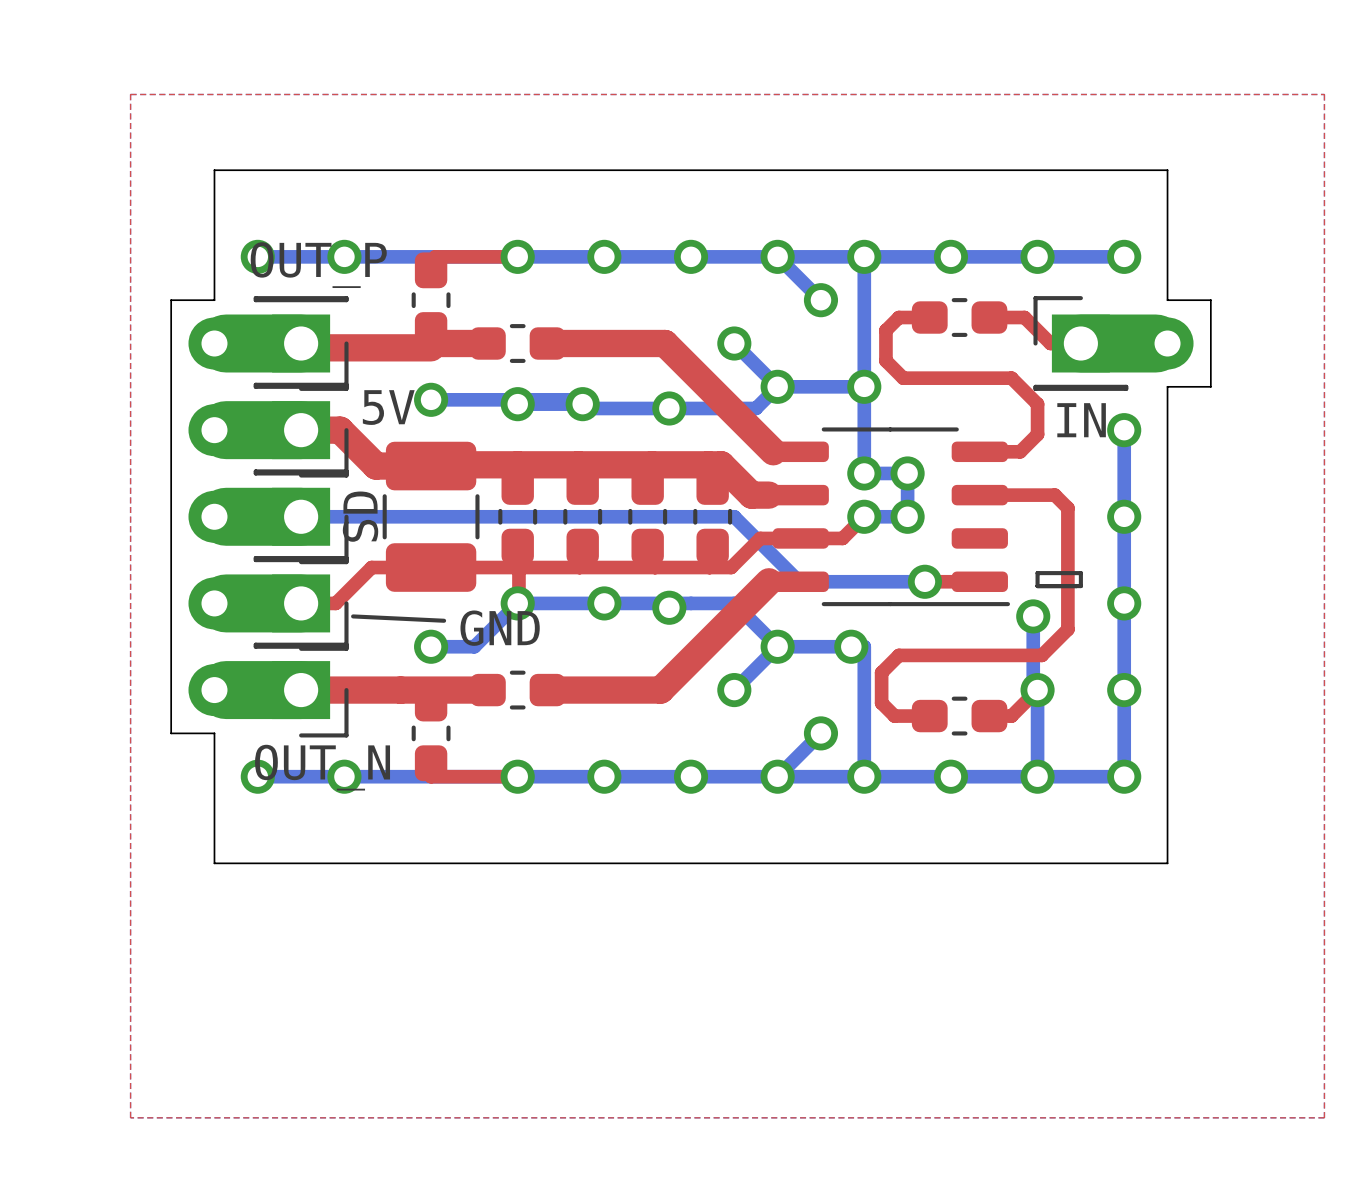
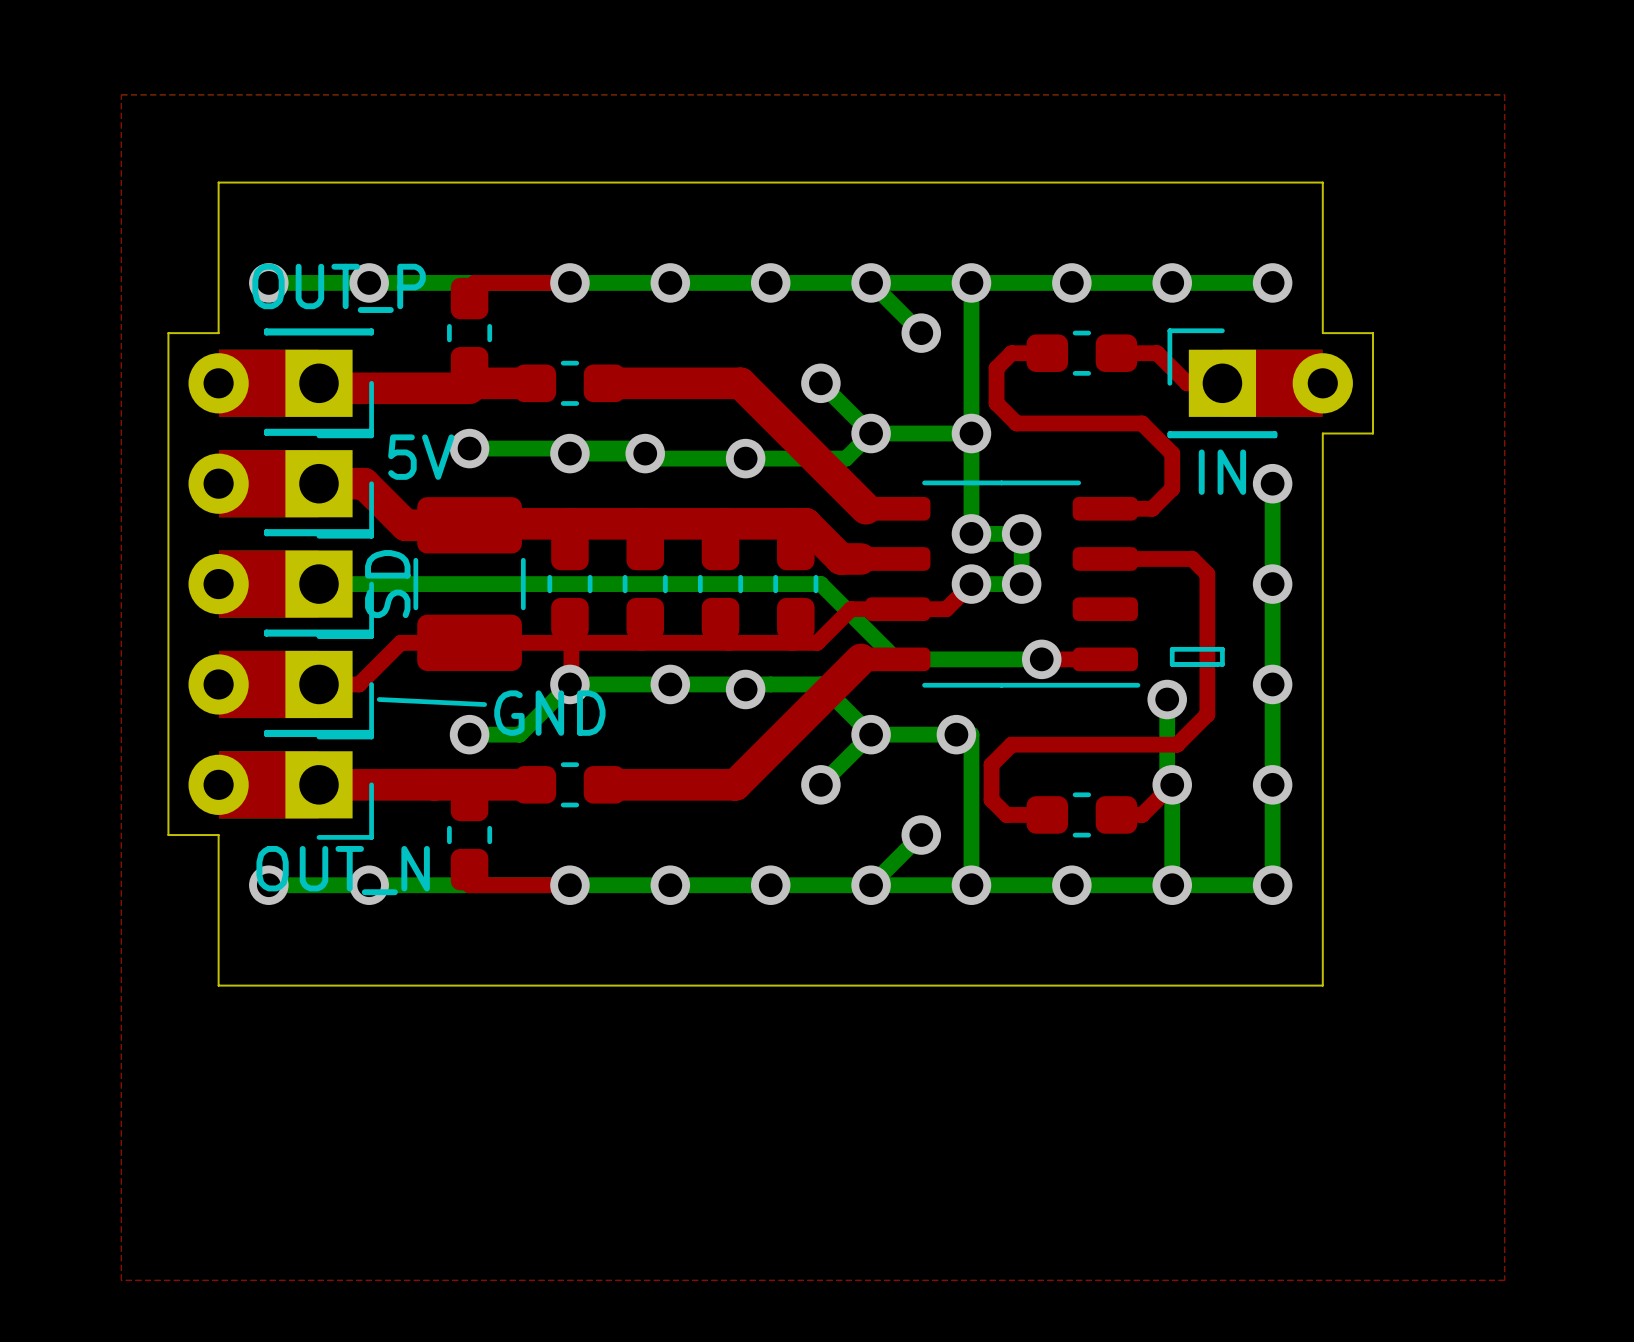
part footprint: [188, 296, 349, 391] -> [188, 328, 374, 439]
part footprint: [1033, 296, 1194, 391] -> [1167, 328, 1353, 439]
part footprint: [188, 382, 349, 478] -> [188, 428, 374, 539]
part footprint: [188, 469, 349, 565] -> [188, 529, 374, 640]
part footprint: [188, 556, 349, 651] -> [188, 629, 374, 740]
part footprint: [188, 642, 349, 738] -> [188, 729, 374, 840]

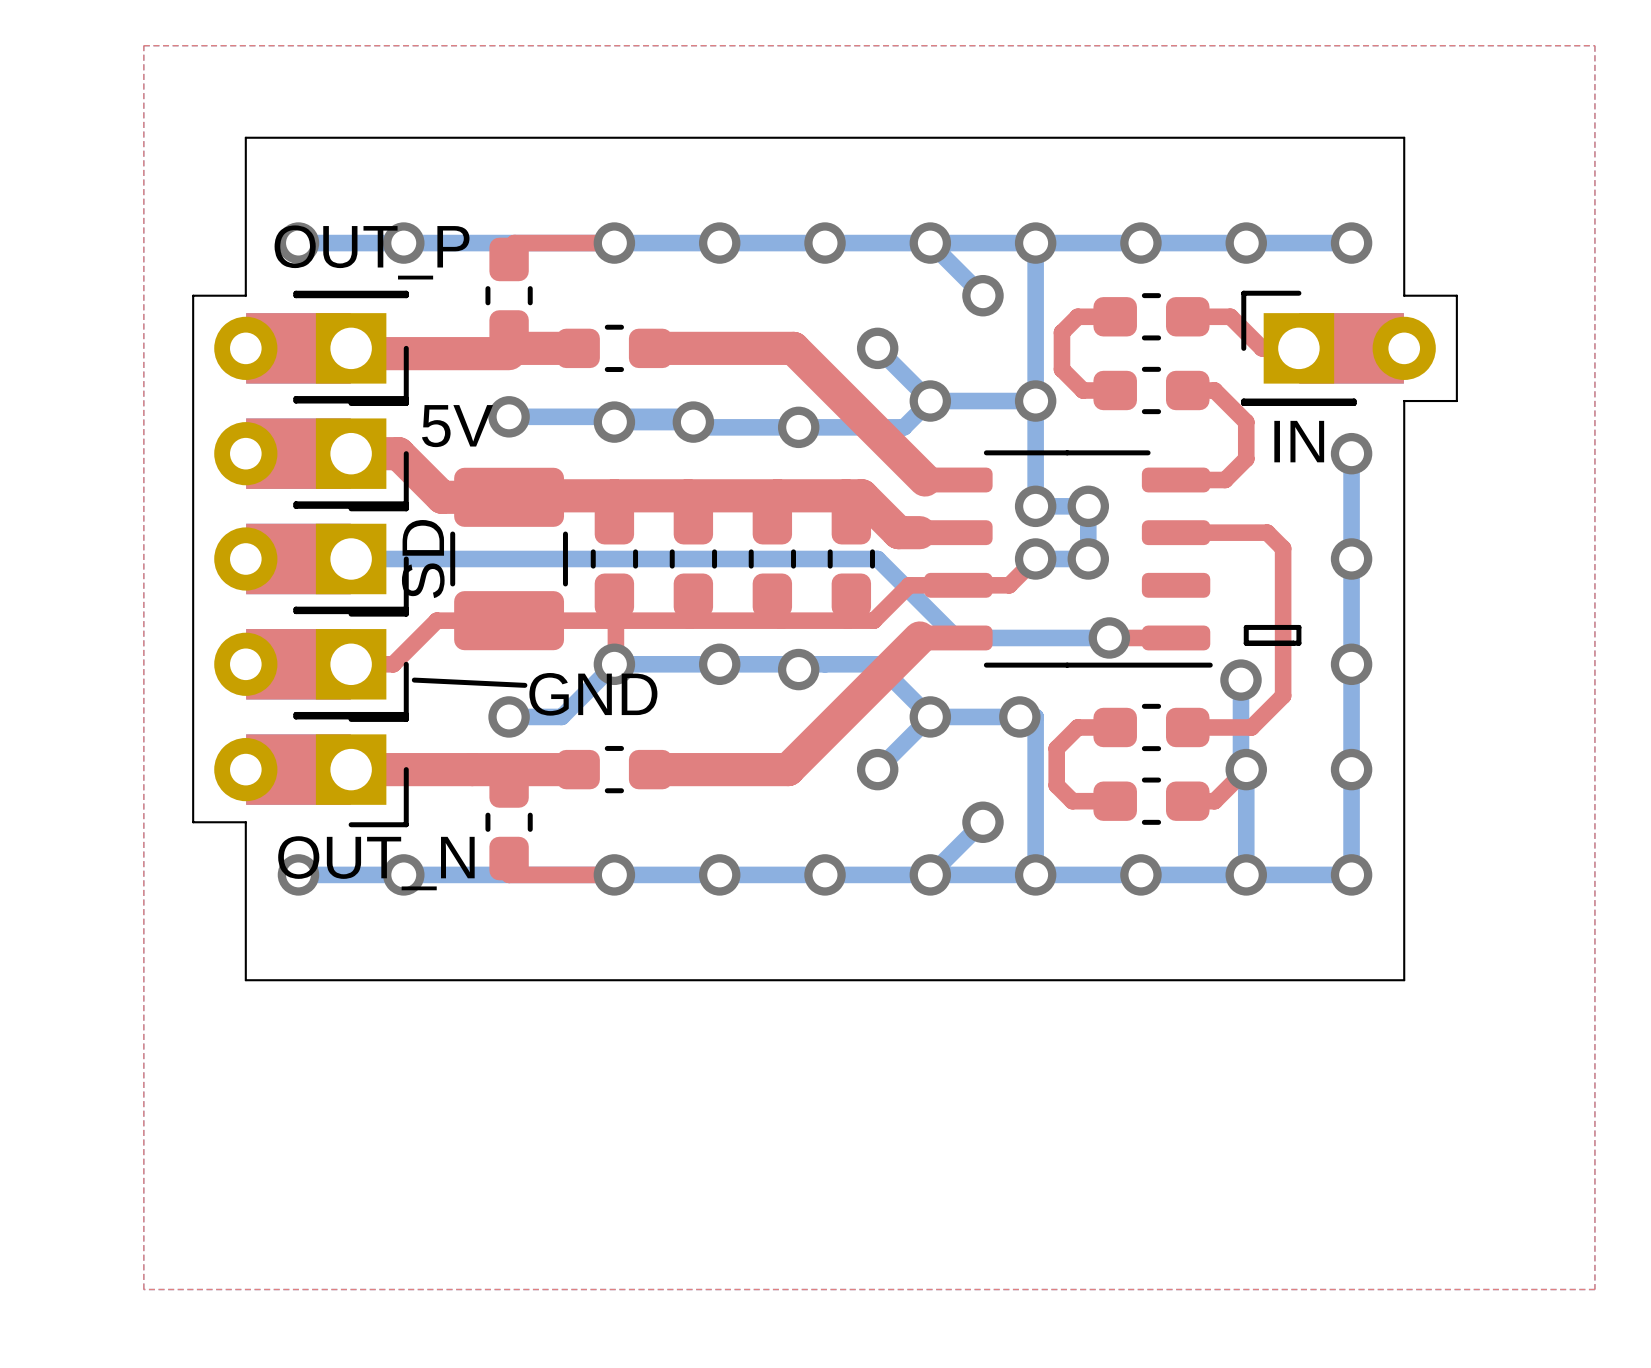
top track: (1047, 423) (1116, 423) -> none
part: none -> (1151, 390)
top track: (1047, 744) (1116, 744) -> none
part: none -> (1151, 727)

